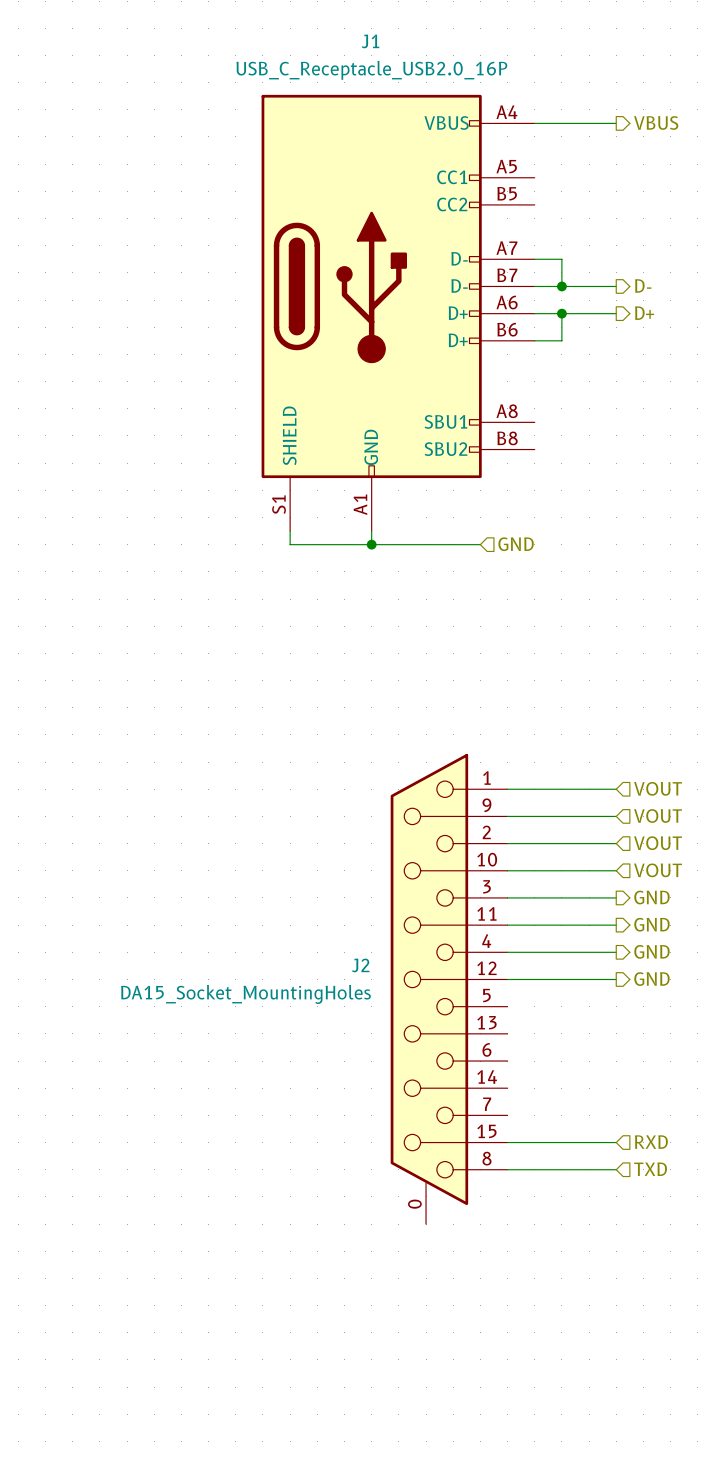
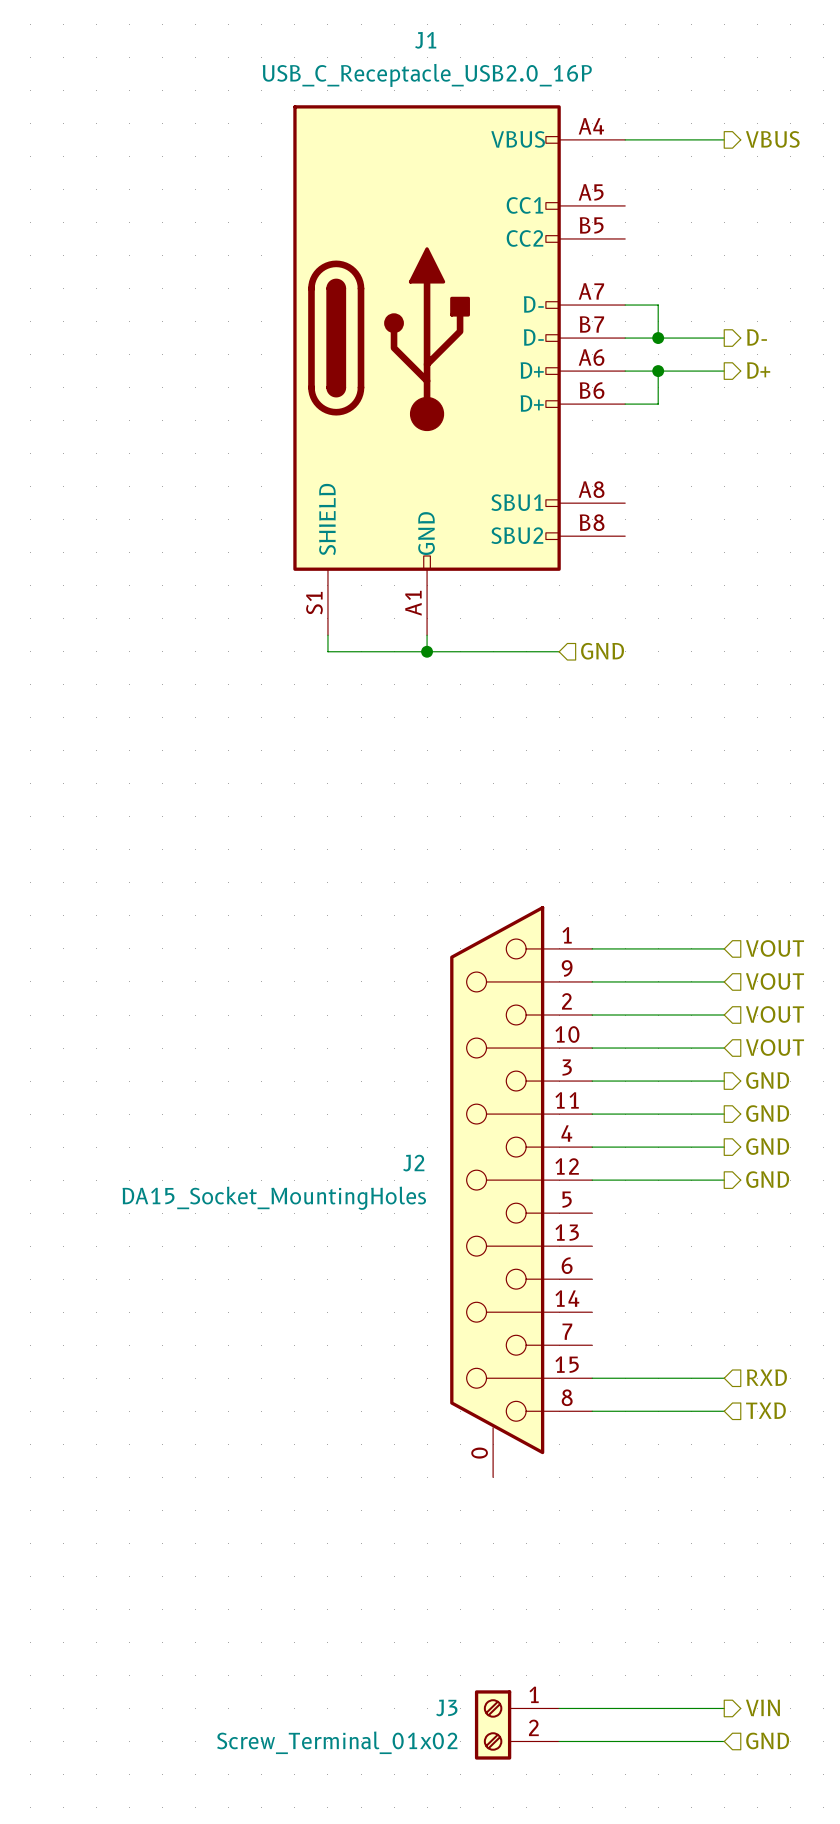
hierarchical label: none -> VIN (762, 1707)
wire: none -> (559, 1708) (724, 1708)
J3: none -> Screw_Terminal_01x02 (517, 1724)
wire: none -> (559, 1741) (724, 1741)
hierarchical label: none -> GND (767, 1740)

